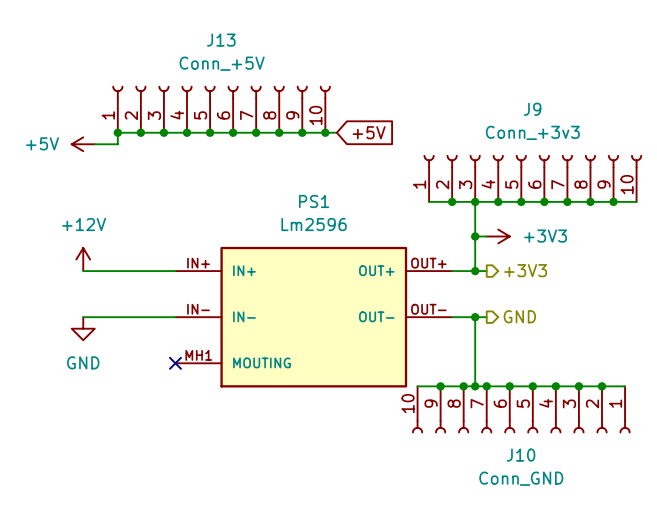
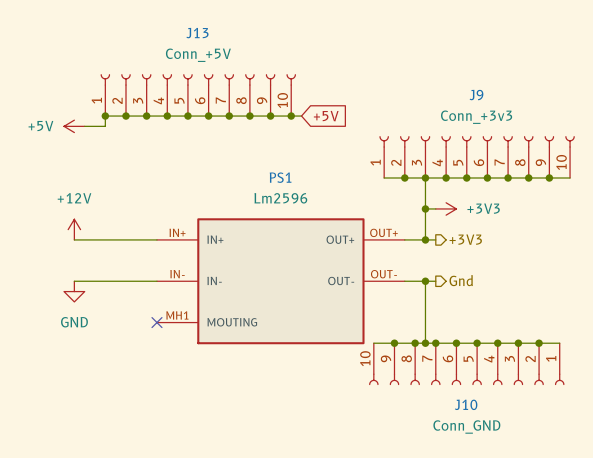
hierarchical label: GND (519, 316) -> Gnd (461, 280)

